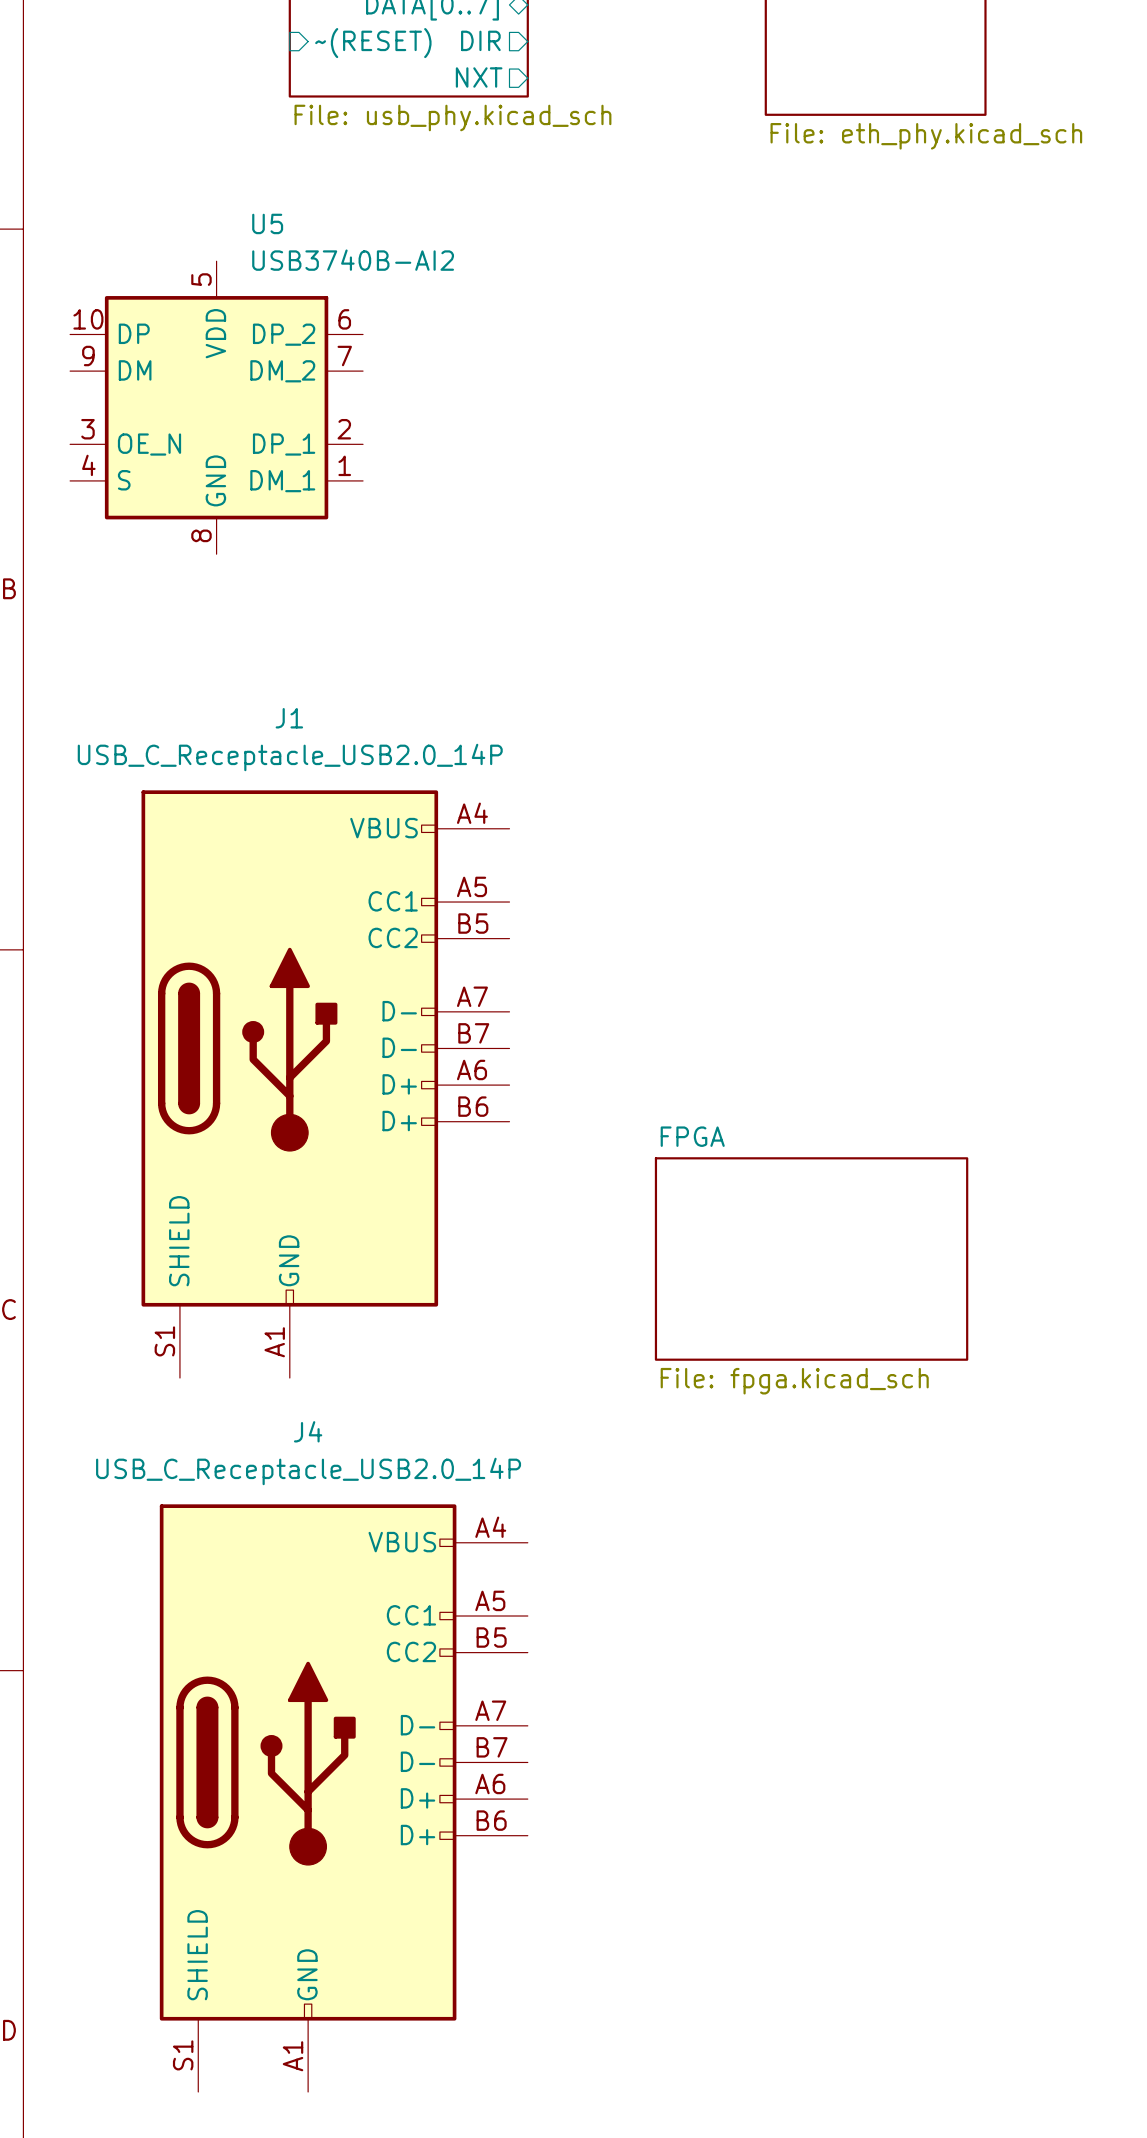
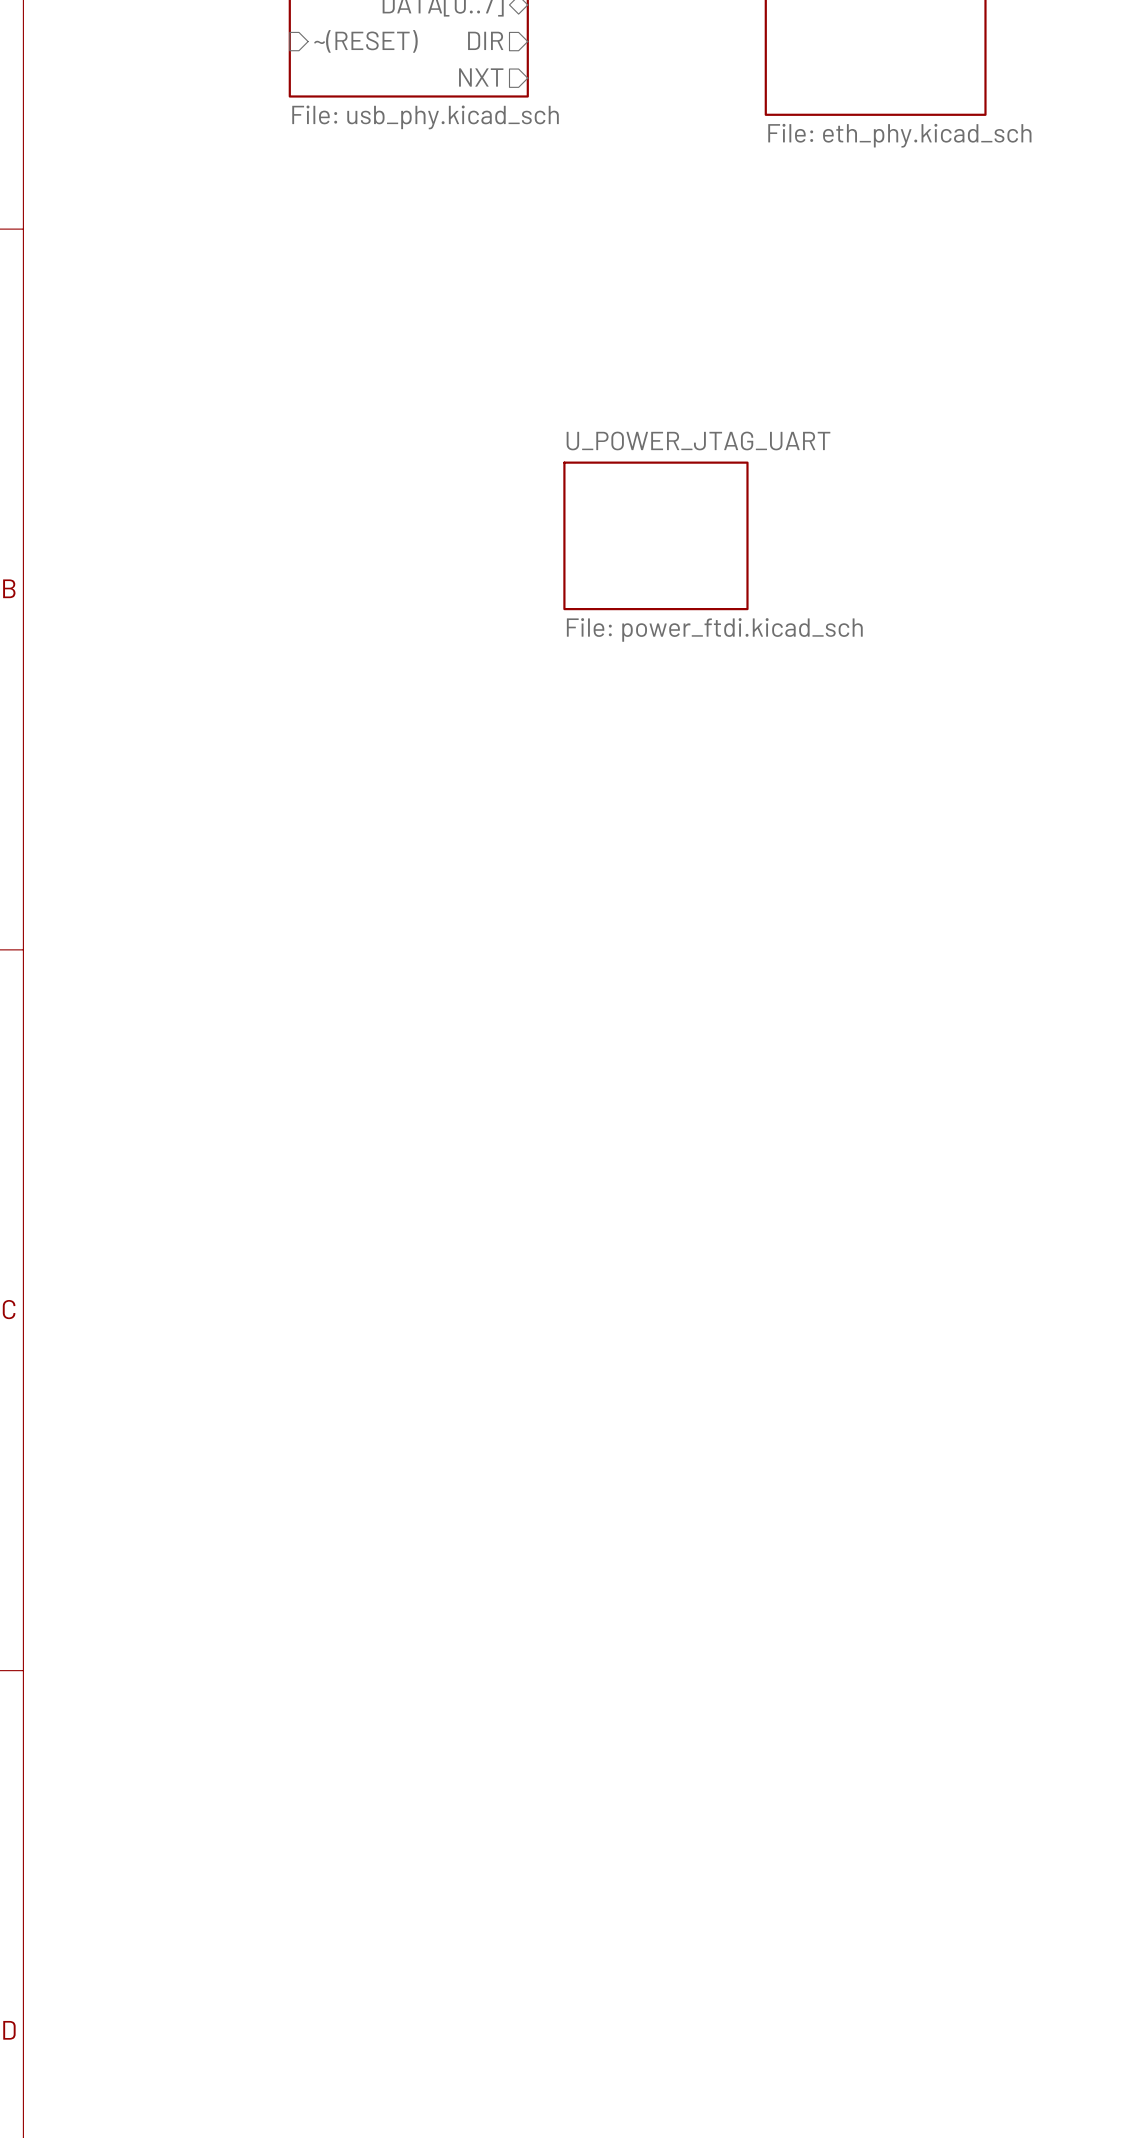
U5: USB3740B-AI2 (216, 407) -> none
sheet U_POWER_JTAG_UART: none -> File: power_ftdi.kicad_sch (655, 535)
J1: USB_C_Receptacle_USB2.0_14P (325, 1084) -> none
sheet FPGA: File: fpga.kicad_sch (811, 1259) -> none
J4: USB_C_Receptacle_USB2.0_14P (343, 1798) -> none

